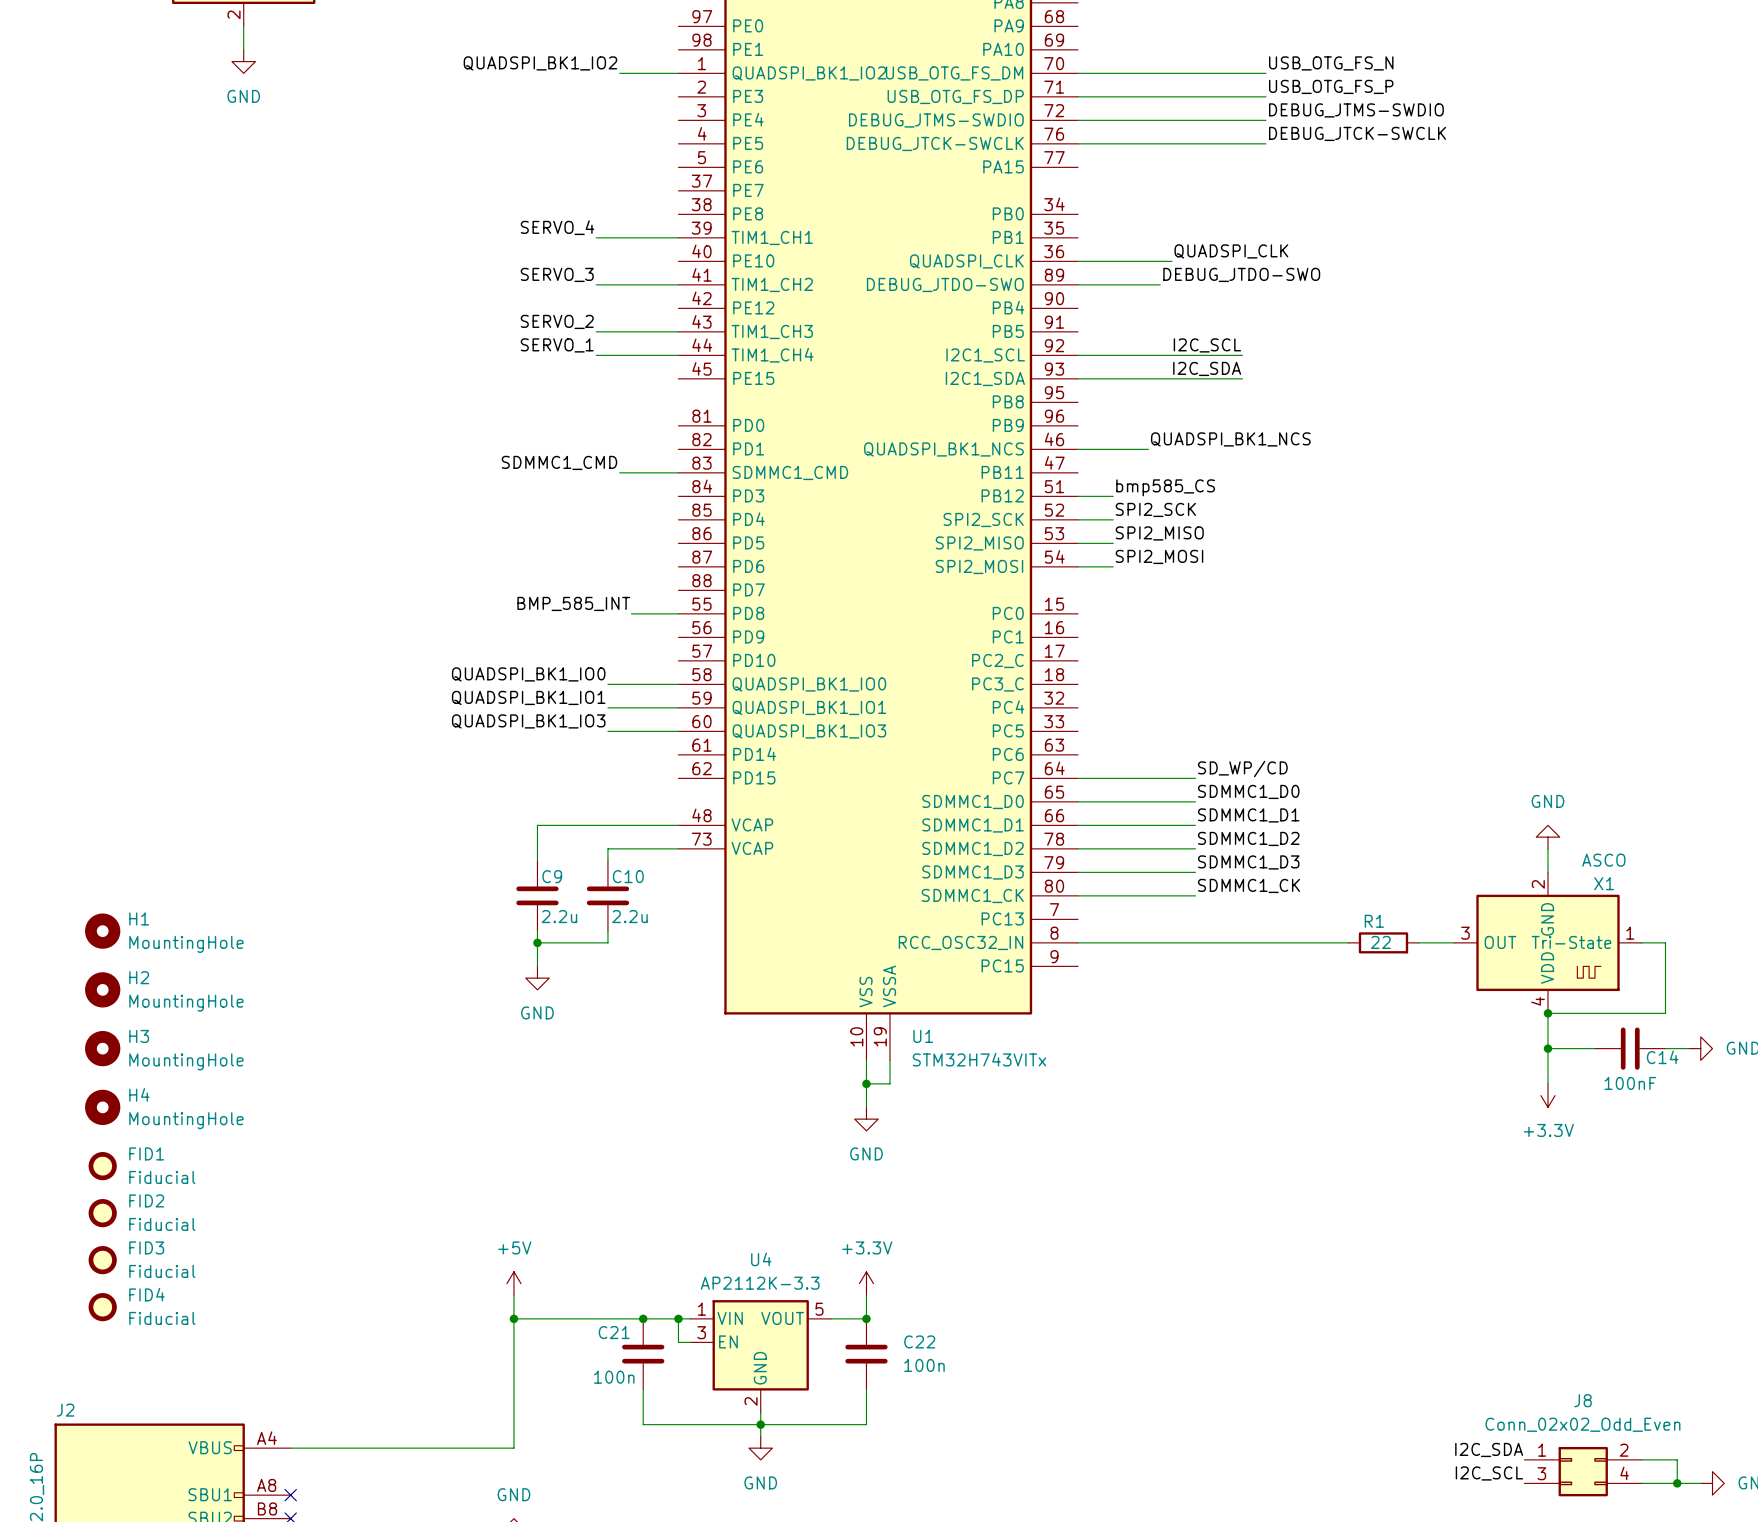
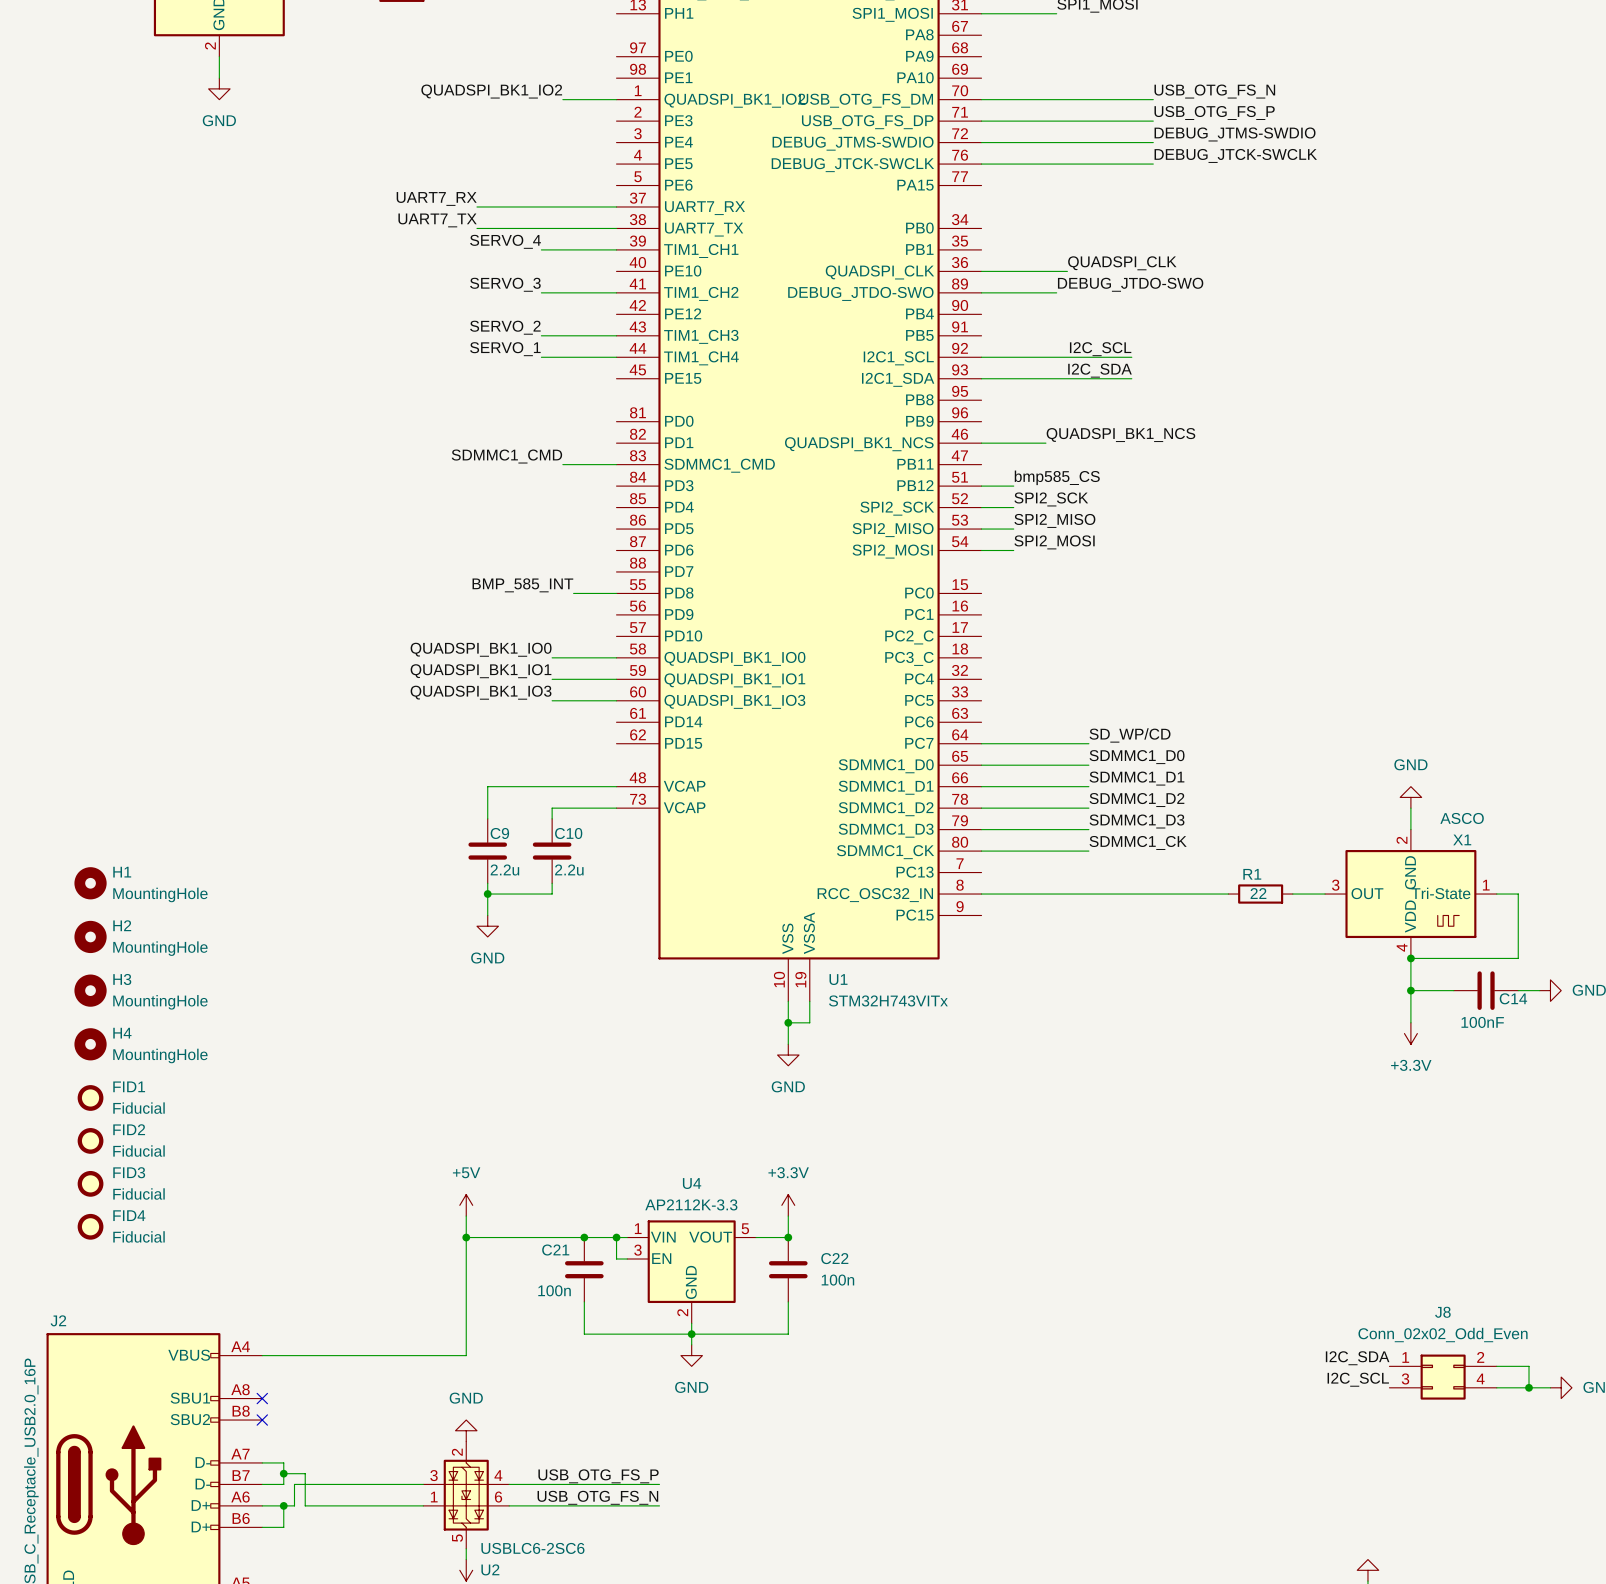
label: none -> UART7_RX (436, 198)
wire: none -> (476, 206) (616, 206)
U1 pin name: PE7 (748, 190) -> UART7_RX (704, 208)
label: none -> UART7_TX (437, 220)
U1 pin name: PE8 (748, 213) -> UART7_TX (704, 229)
wire: none -> (476, 228) (616, 228)

